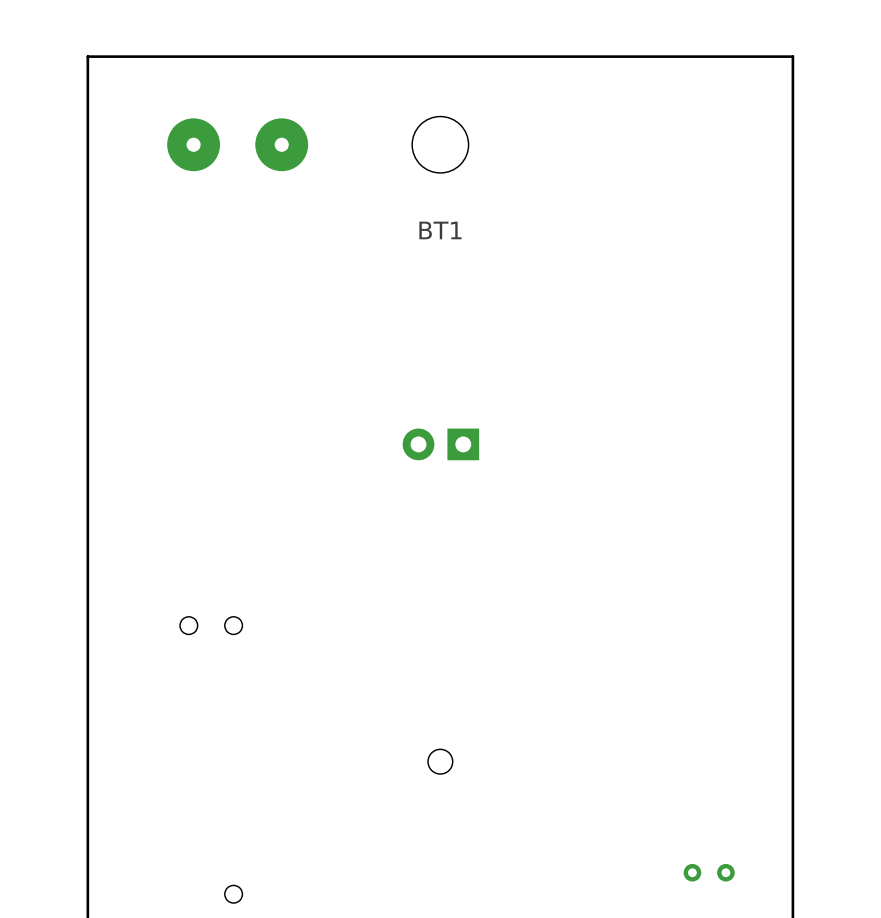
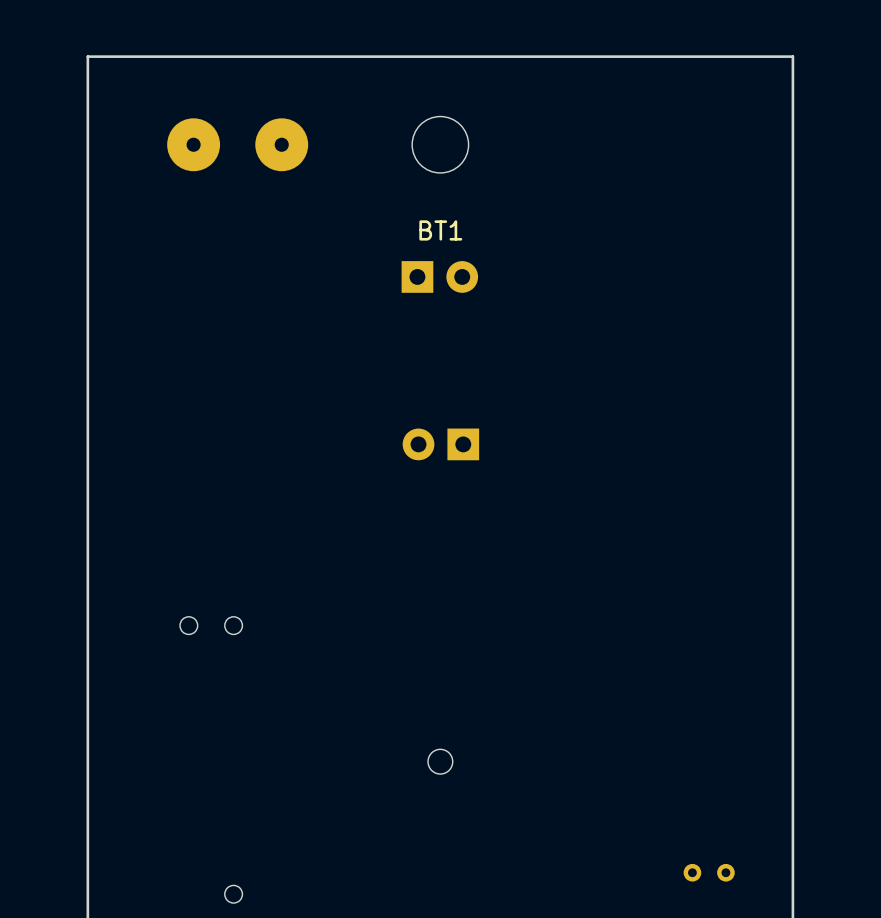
part: none -> (439, 276)

